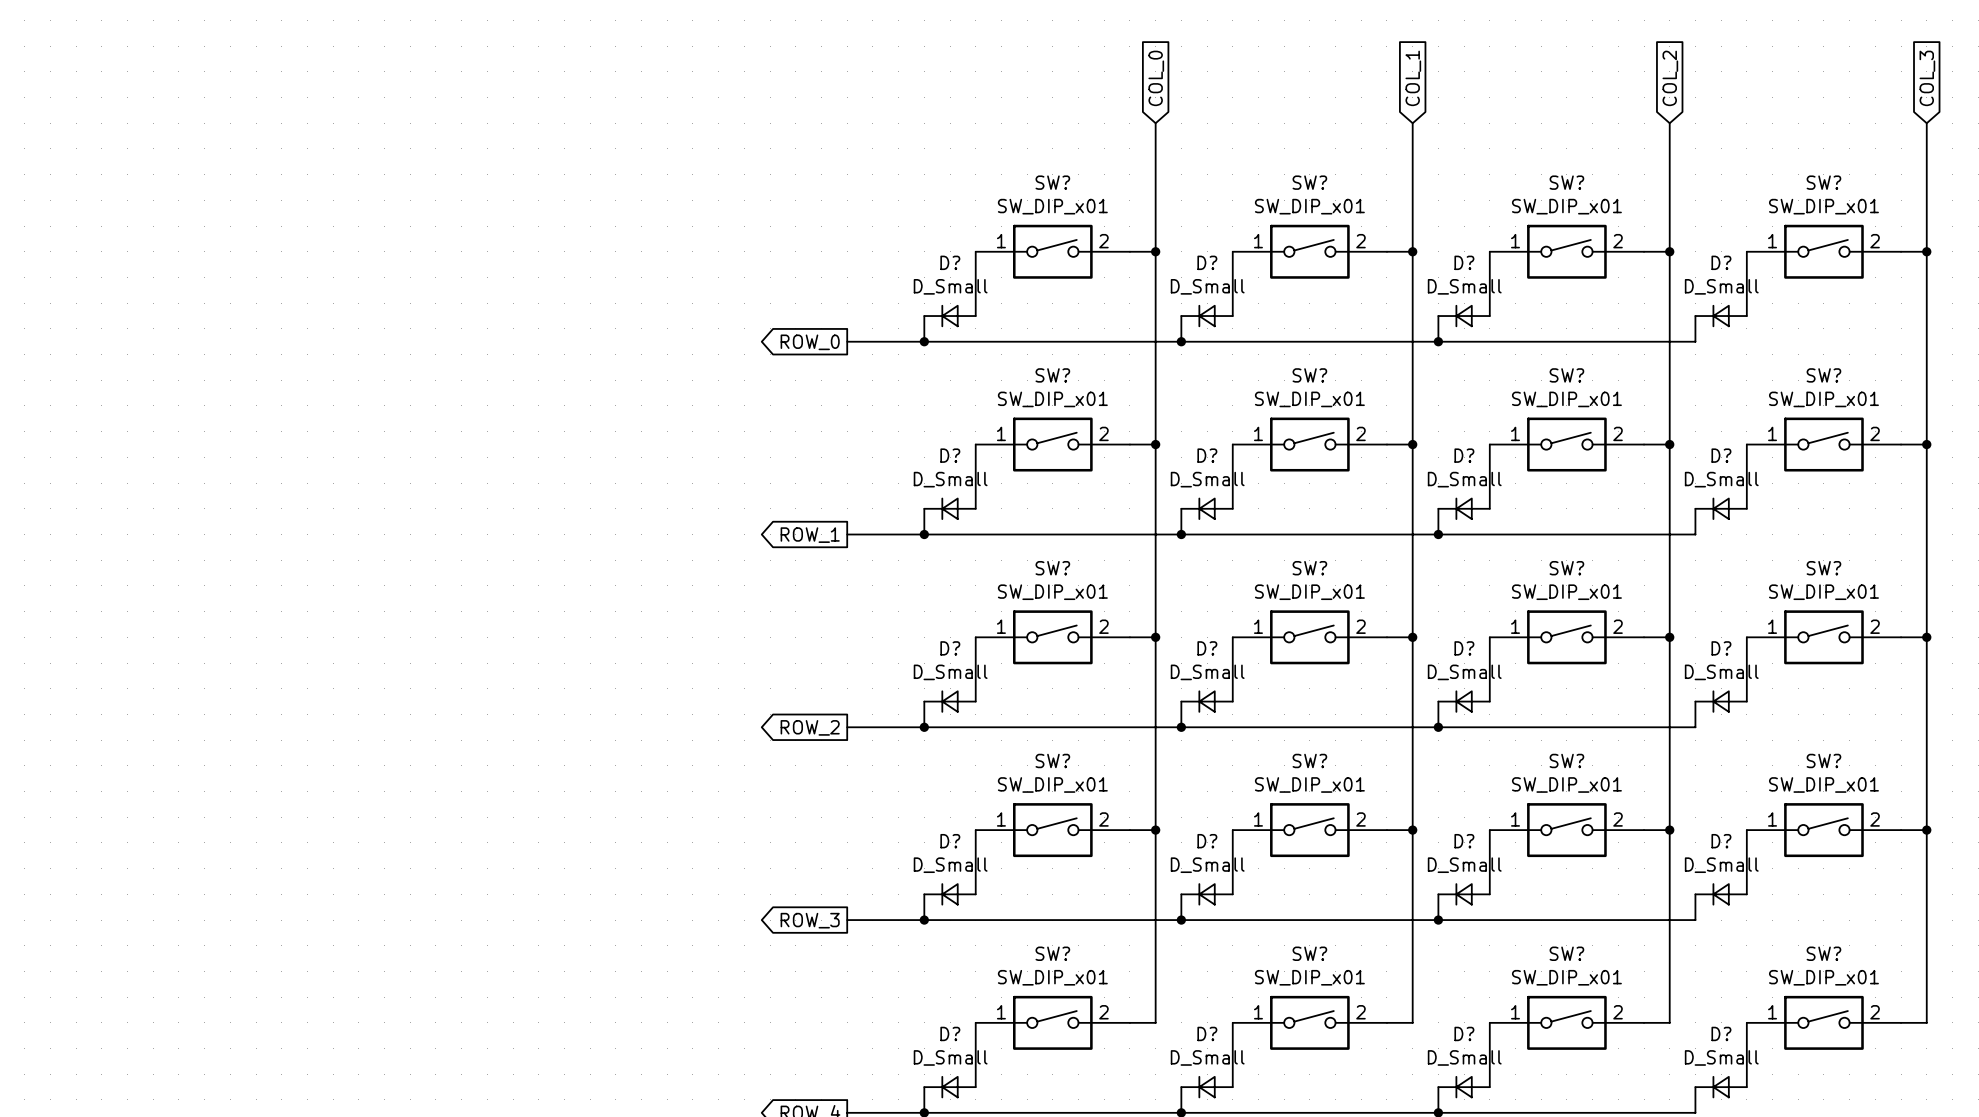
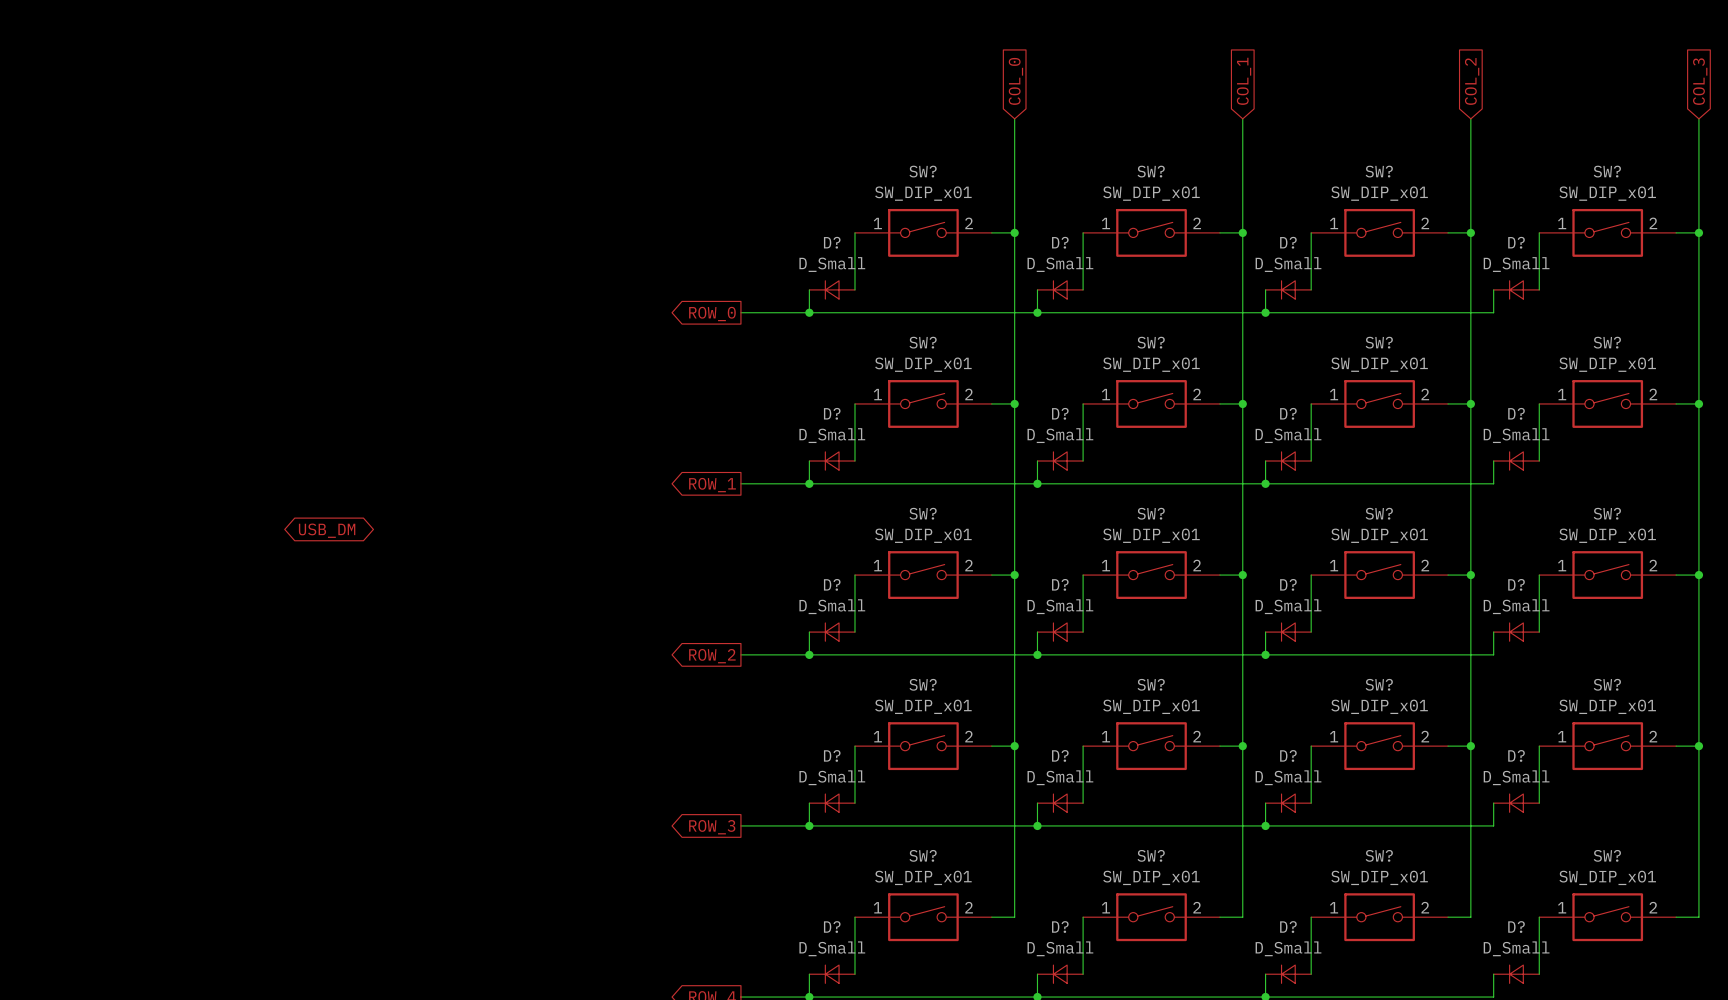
global label: none -> USB_DM (327, 530)

